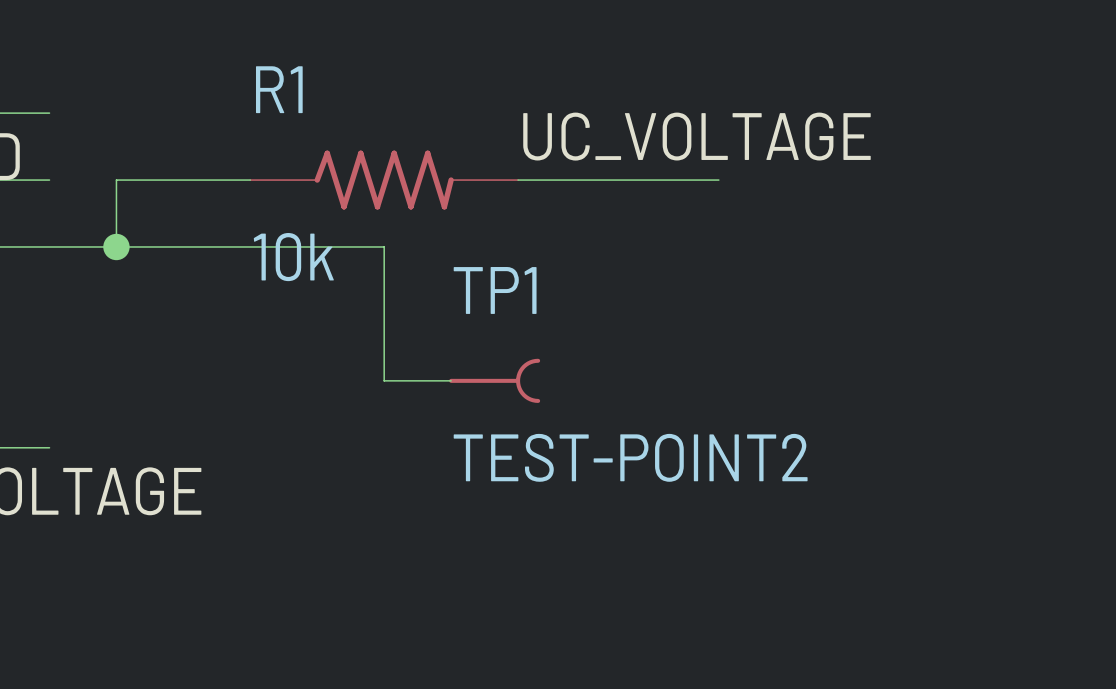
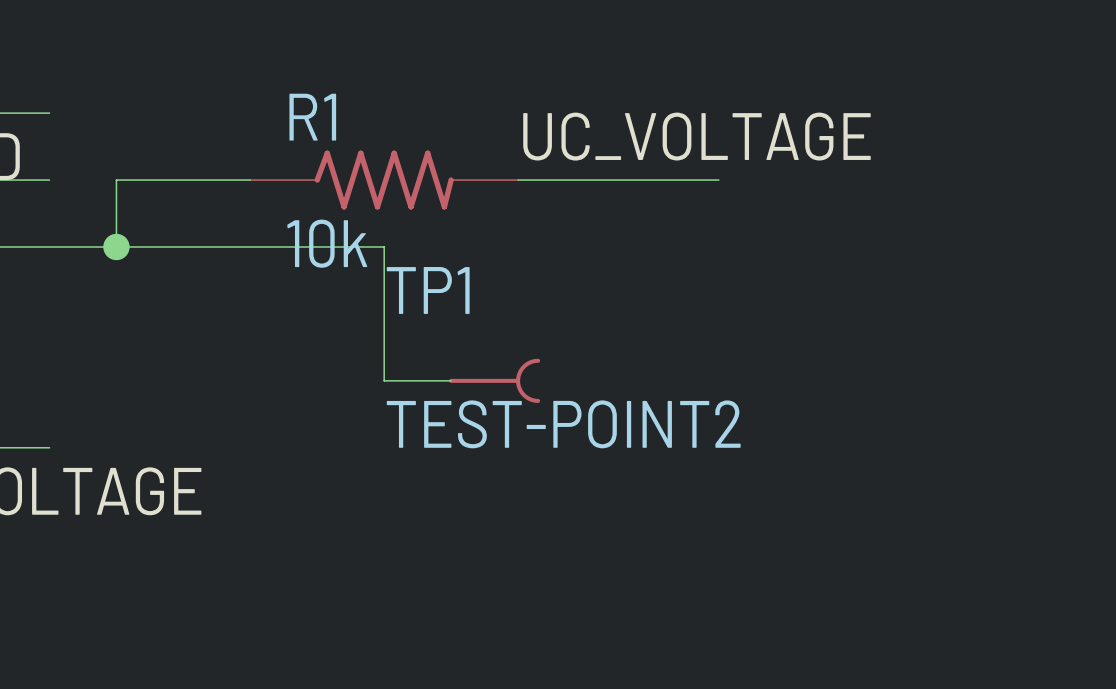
R1 name position: R1 (279, 89) -> R1 (312, 117)
R1 value position: 10k (293, 257) -> 10k (327, 243)
TP1 name position: TP1 (495, 290) -> TP1 (428, 290)
TP1 value position: TEST-POINT2 (630, 457) -> TEST-POINT2 (563, 424)

